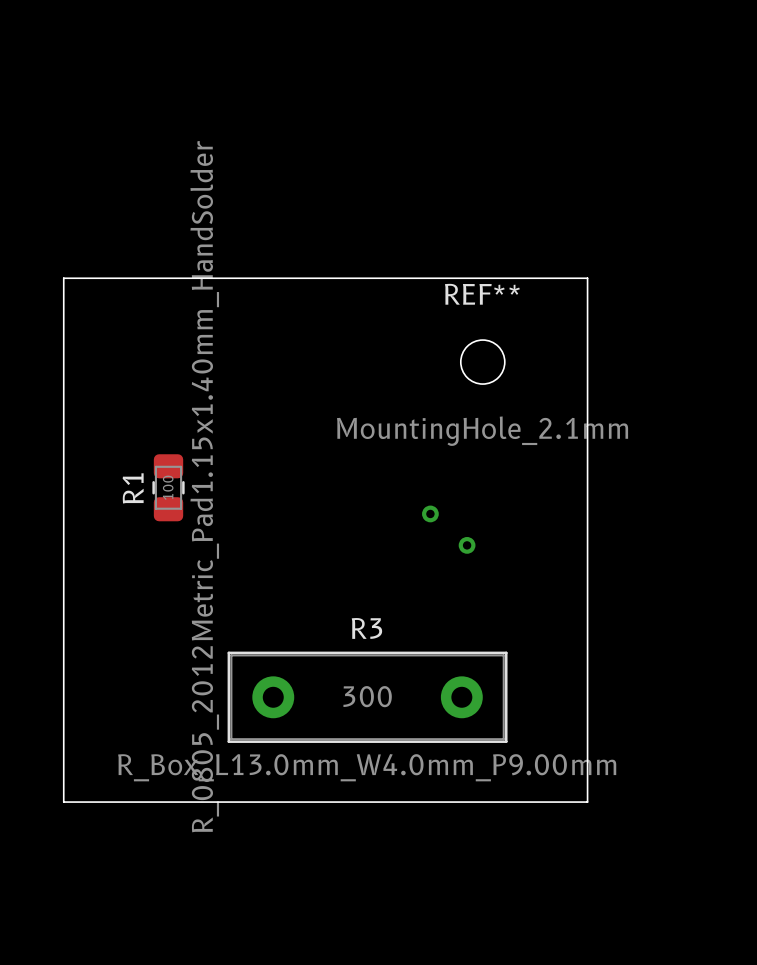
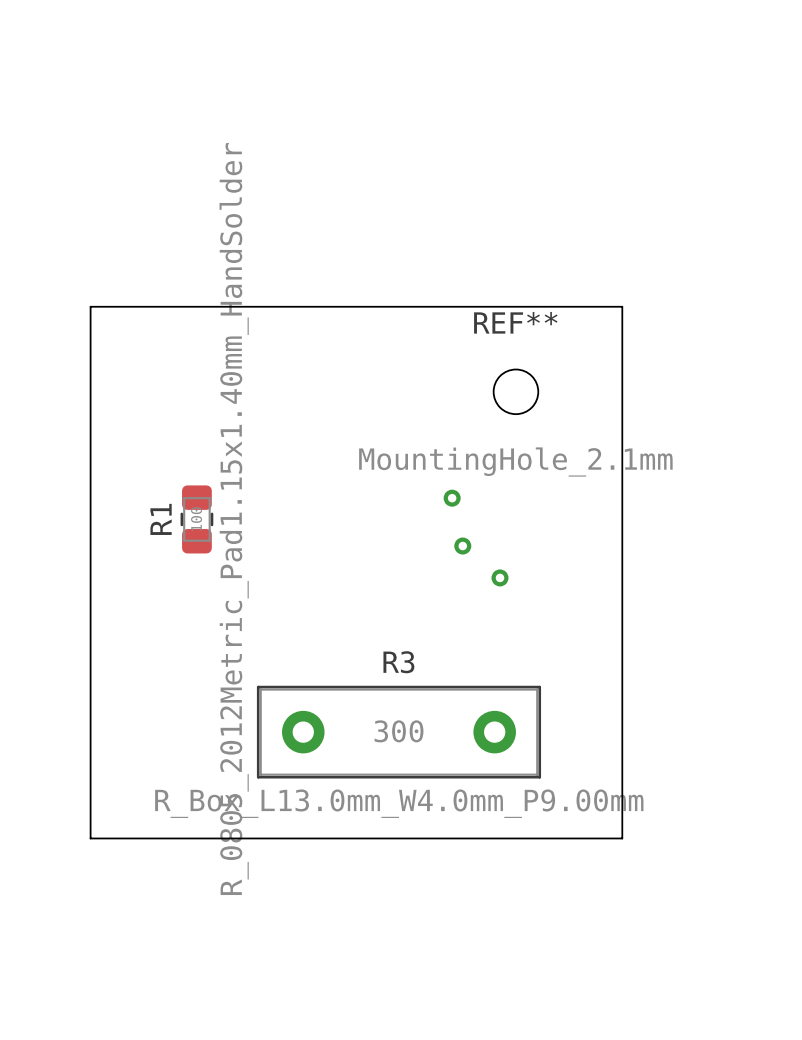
via: none -> (452, 498)

